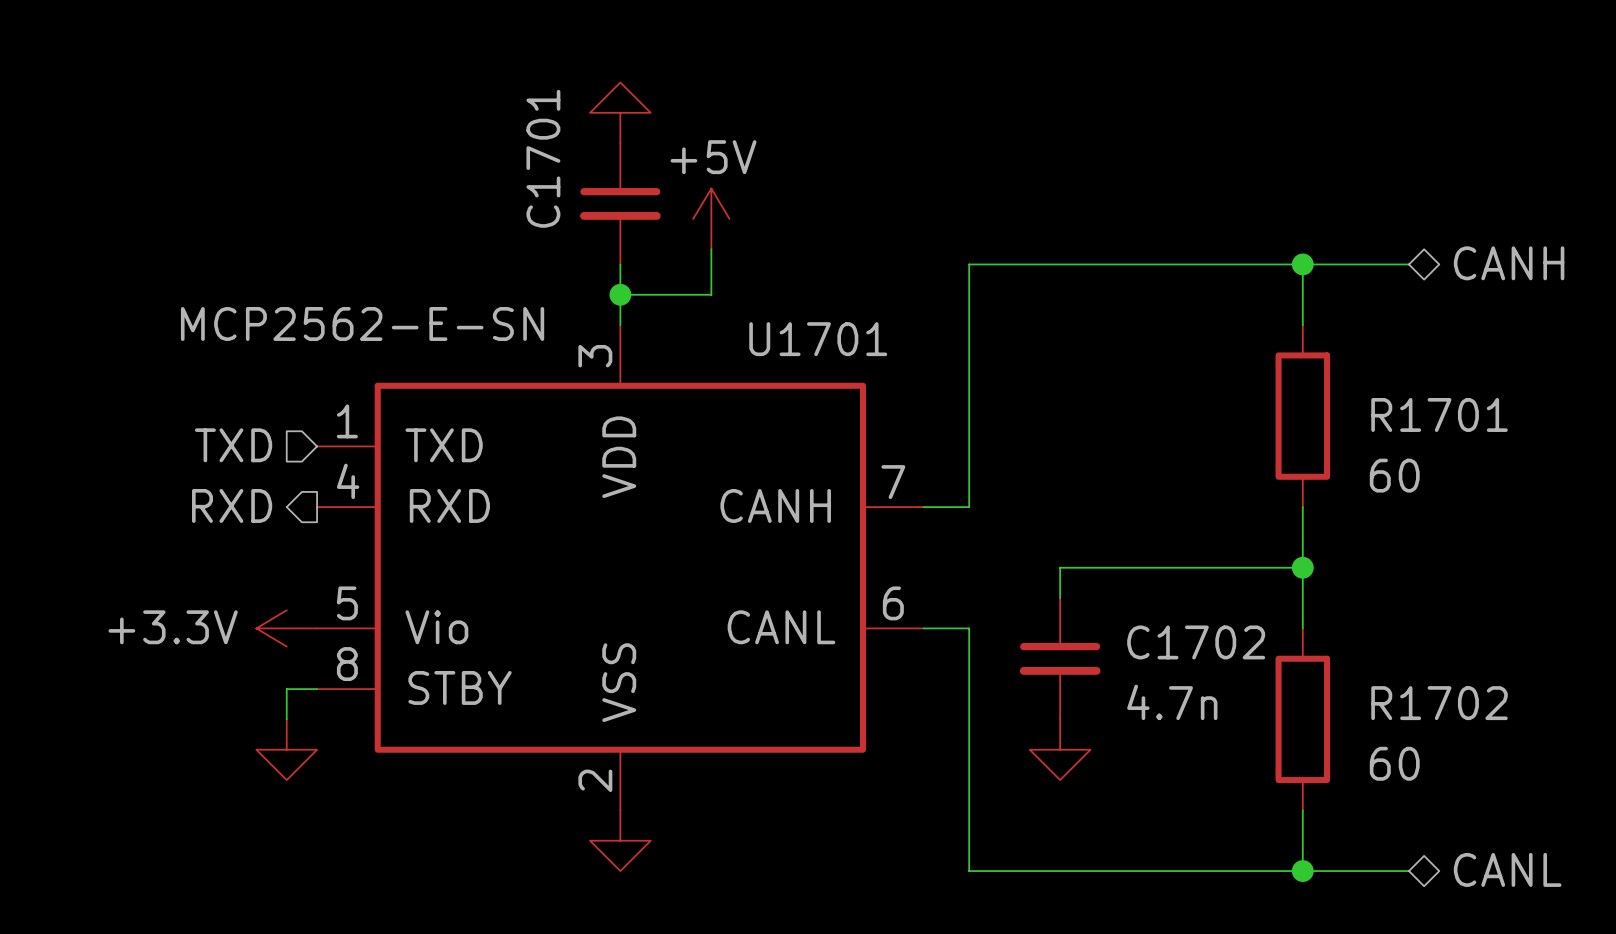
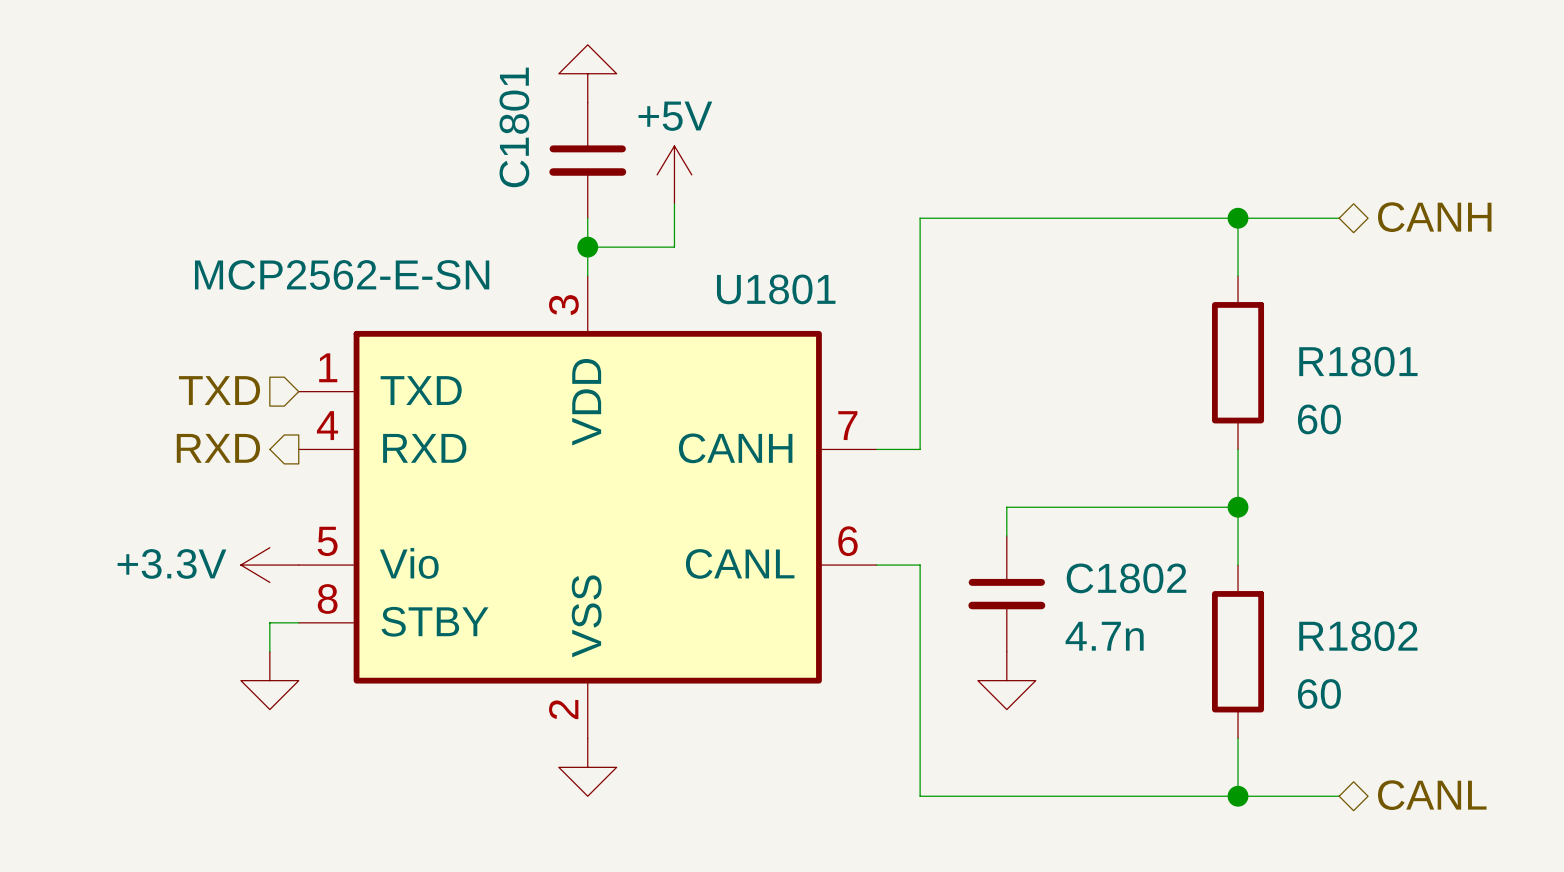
C1701 name: C1701 (543, 158) -> C1801 (514, 127)
U1701 name: U1701 (818, 339) -> U1801 (776, 289)
R1701 name: R1701 (1439, 414) -> R1801 (1358, 361)
C1702 name: C1702 (1196, 642) -> C1802 (1126, 578)
R1702 name: R1702 (1439, 703) -> R1802 (1358, 636)

